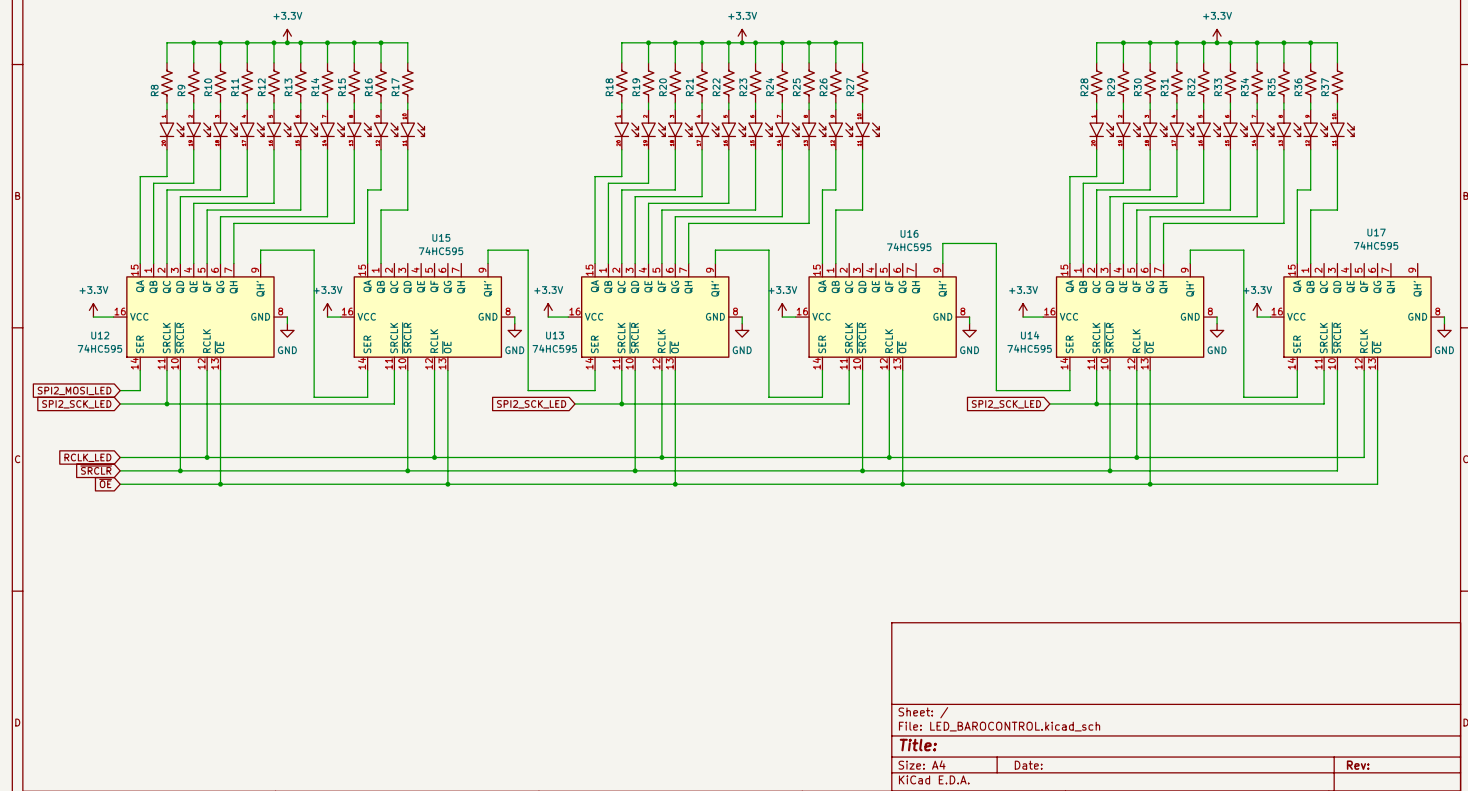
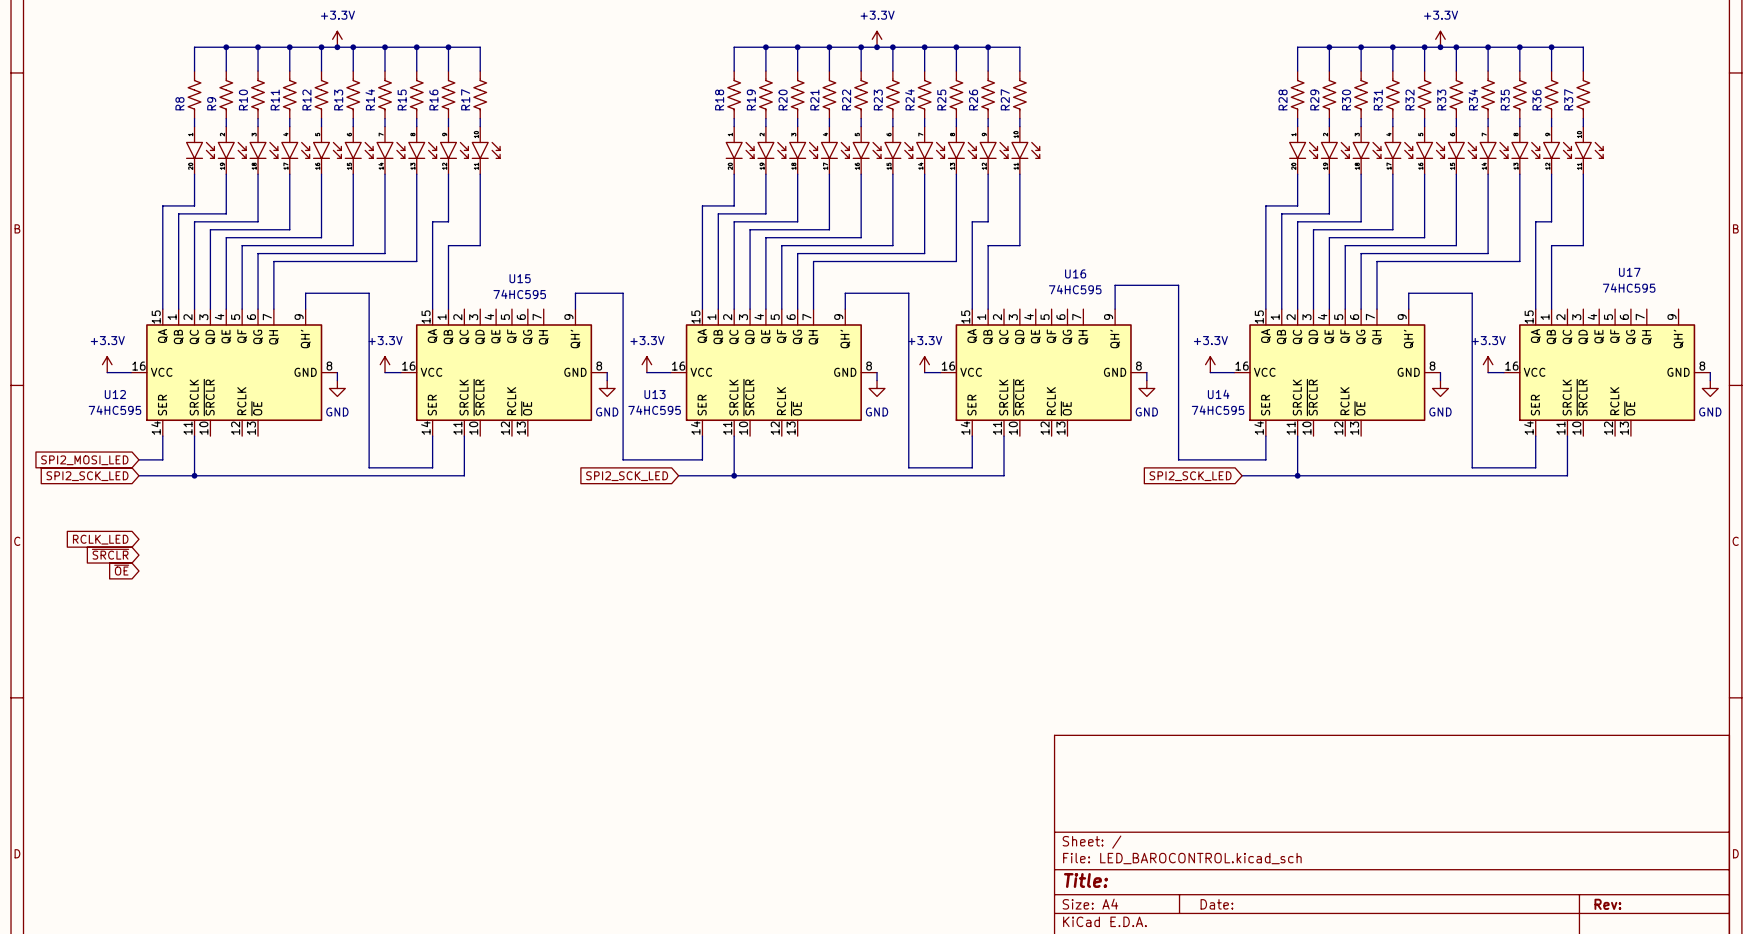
wire: (180, 370) (180, 470) -> none
wire: (207, 370) (207, 457) -> none
wire: (220, 370) (220, 484) -> none
wire: (407, 370) (407, 470) -> none
wire: (434, 370) (434, 457) -> none
wire: (447, 370) (447, 484) -> none
wire: (635, 370) (635, 470) -> none
wire: (661, 370) (661, 457) -> none
wire: (675, 370) (675, 484) -> none
wire: (862, 370) (862, 470) -> none
wire: (889, 370) (889, 457) -> none
wire: (902, 370) (902, 484) -> none
wire: (1110, 370) (1110, 470) -> none
wire: (1136, 370) (1136, 457) -> none
wire: (1150, 370) (1150, 484) -> none
wire: (1337, 370) (1337, 470) (120, 470) -> none
wire: (1364, 370) (1364, 457) (120, 457) -> none
wire: (1377, 370) (1377, 484) (120, 484) -> none
junction: (207, 457) -> none
junction: (434, 457) -> none
junction: (661, 457) -> none
junction: (889, 457) -> none
junction: (1136, 457) -> none
junction: (180, 470) -> none
junction: (407, 470) -> none
junction: (635, 470) -> none
junction: (862, 470) -> none
junction: (1110, 470) -> none
junction: (220, 484) -> none
junction: (447, 484) -> none
junction: (675, 484) -> none
junction: (902, 484) -> none
junction: (1150, 484) -> none

